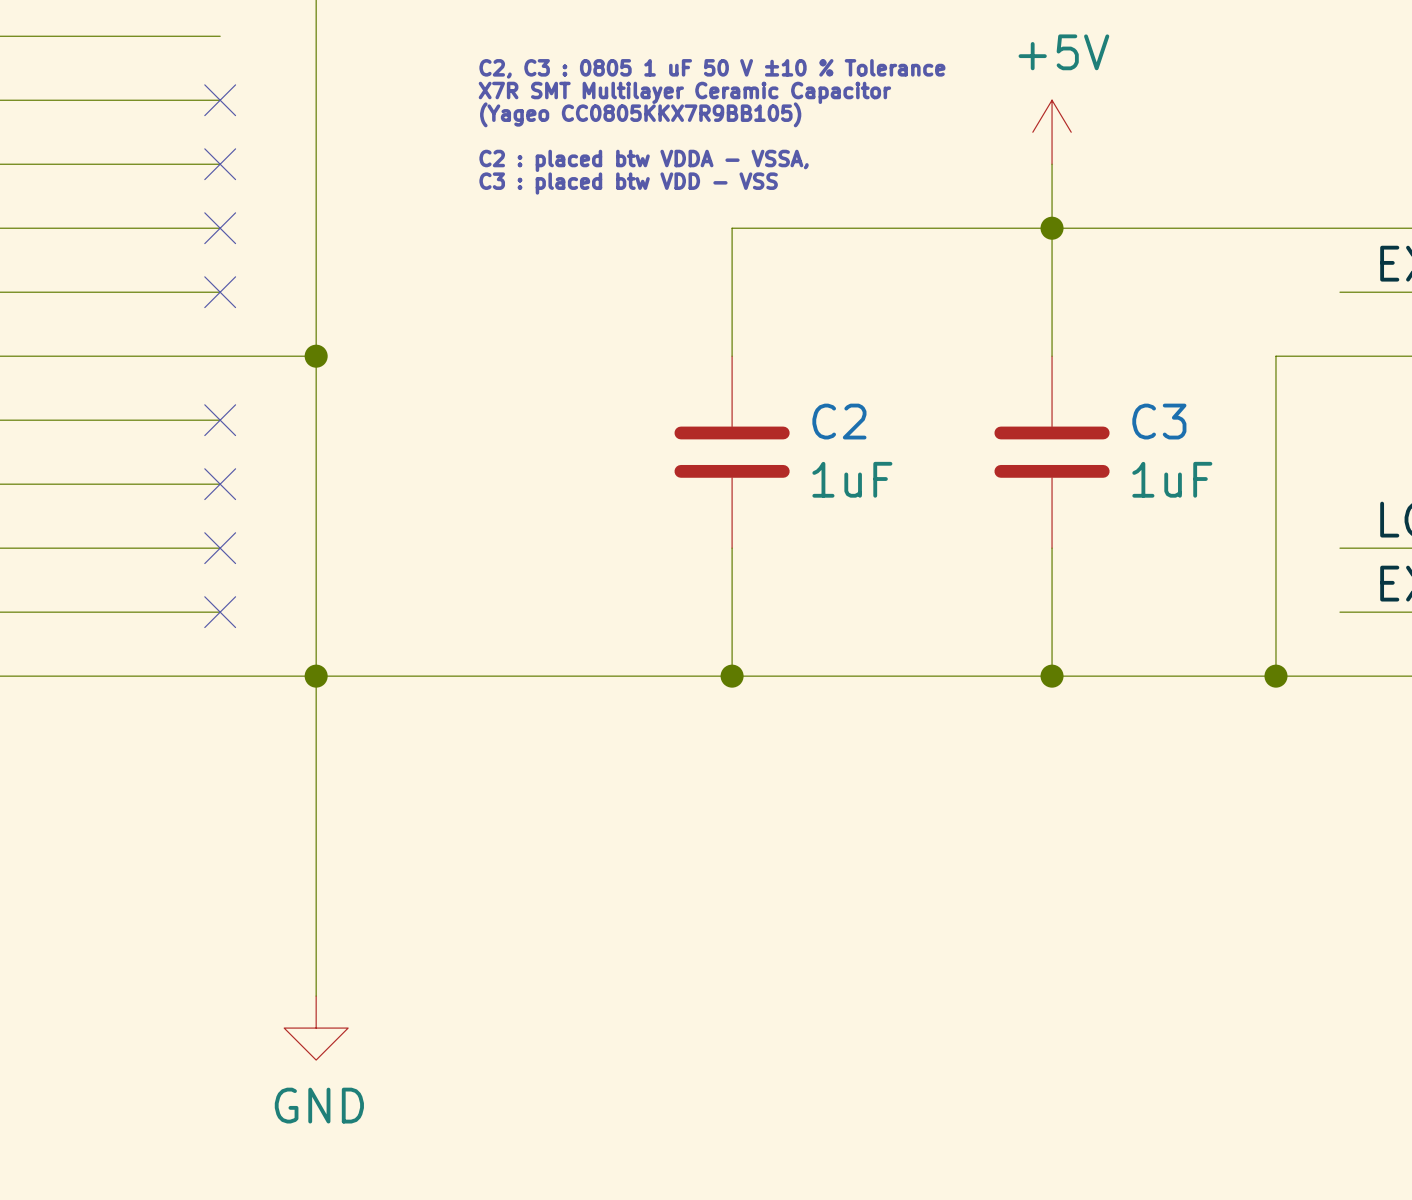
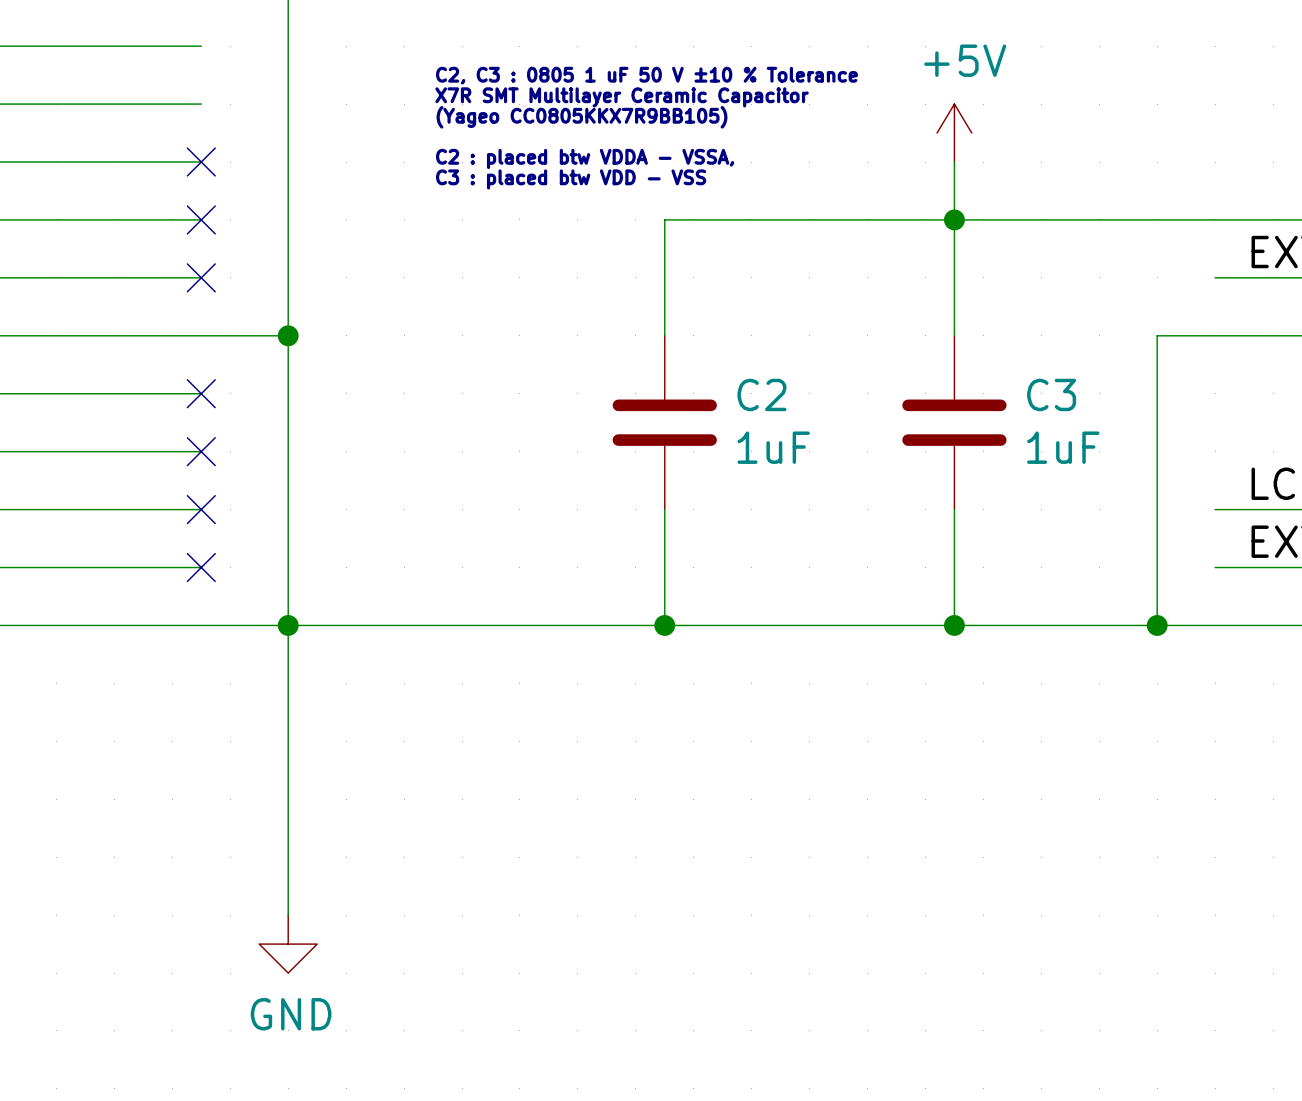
no-connect mark: (220, 100) -> none

